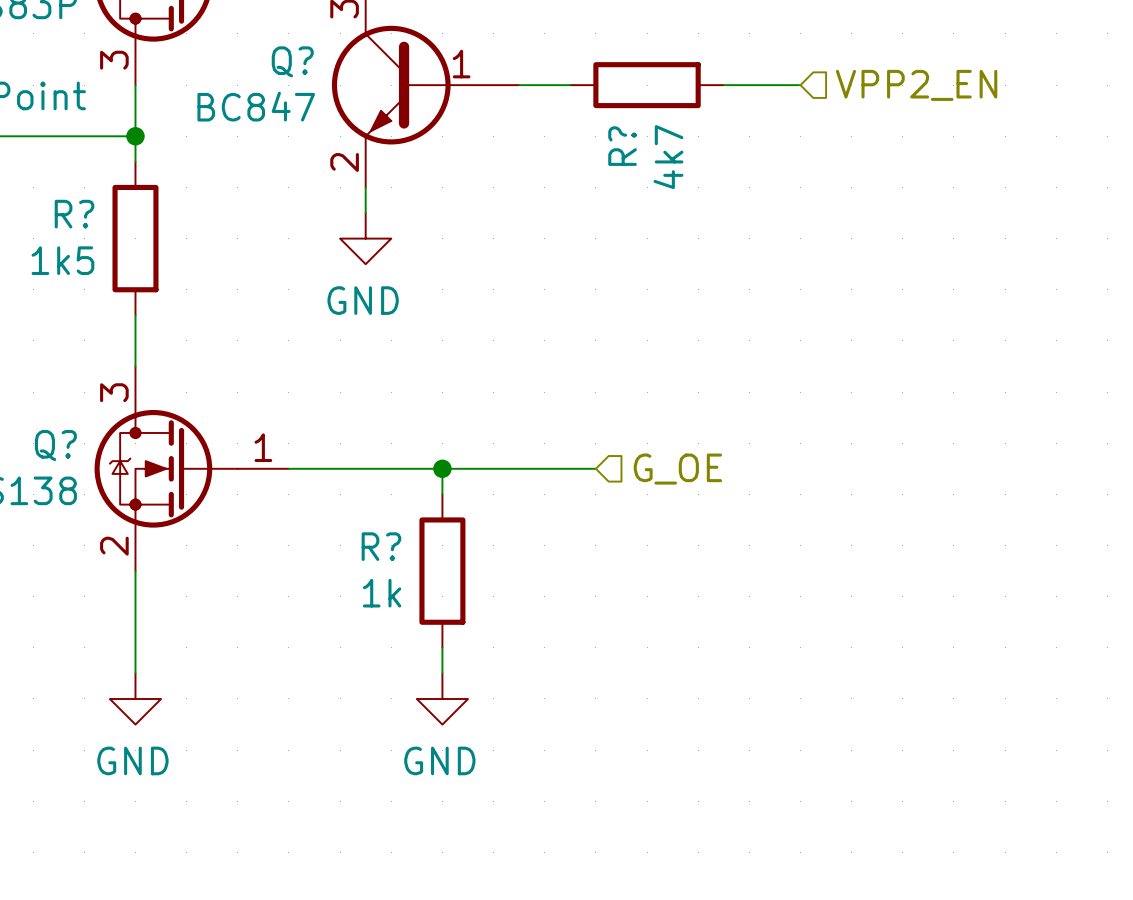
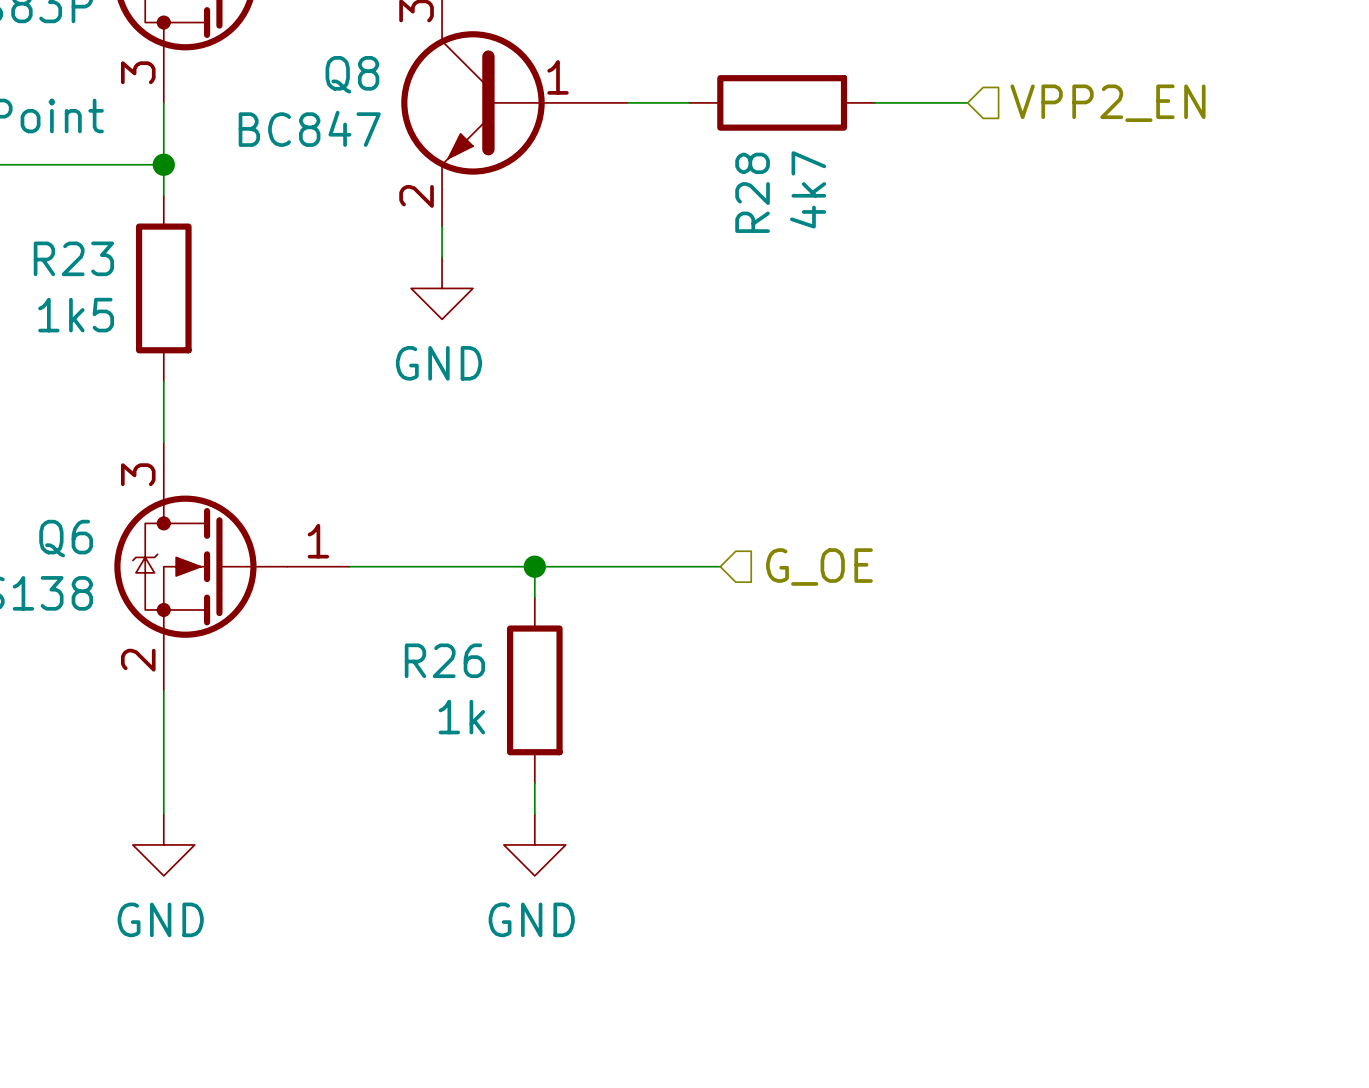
Q? name: Q? (292, 61) -> Q8 (352, 74)
R? name: R? (622, 146) -> R28 (752, 192)
R? name: R? (74, 214) -> R23 (73, 258)
Q? name: Q? (55, 445) -> Q6 (66, 538)
R? name: R? (381, 546) -> R26 (444, 660)

